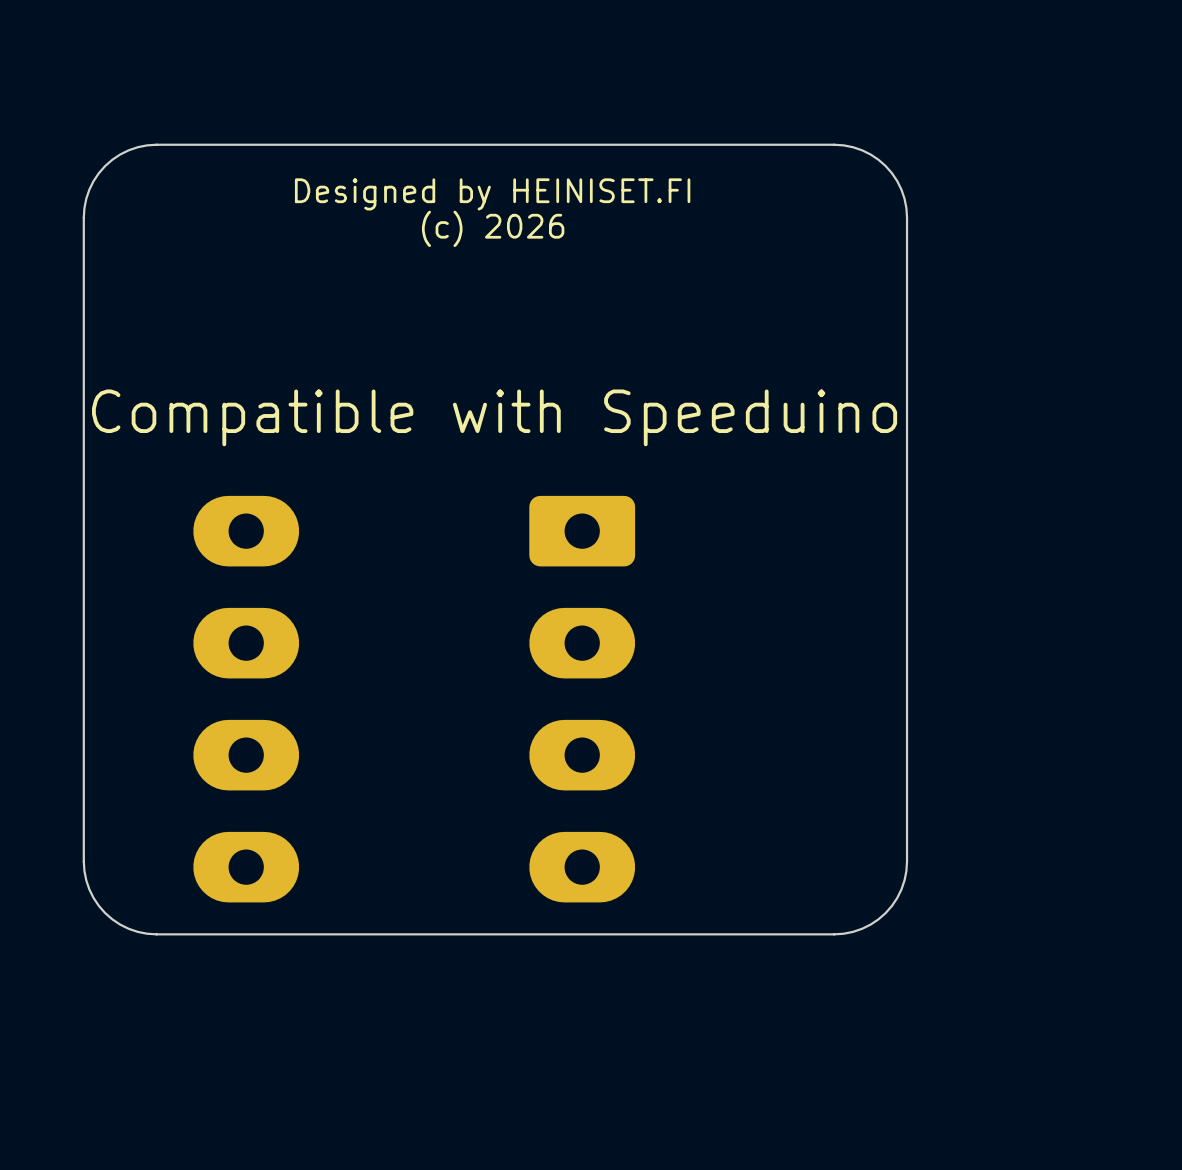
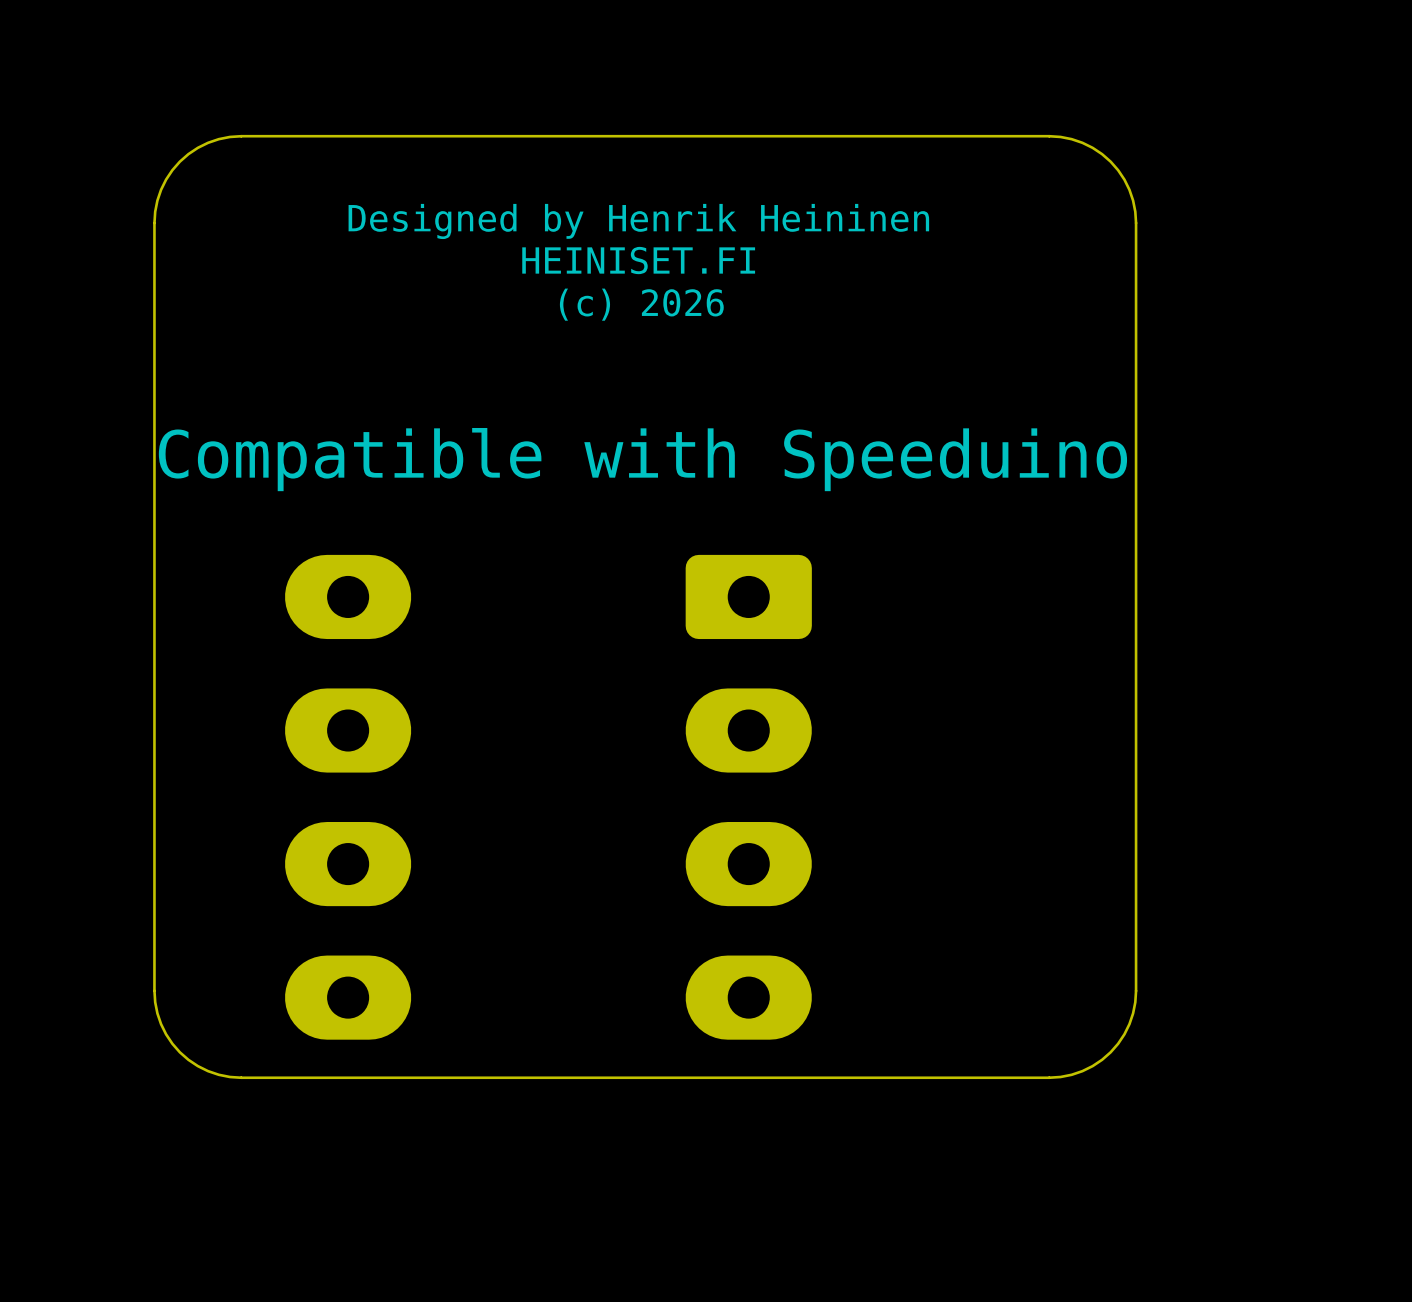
text: Designed by HEINISET.FI (492, 194) -> Designed by Henrik Heininen (638, 221)
text position: (c) 2026 (493, 228) -> (c) 2026 (641, 304)
text: none -> HEINISET.FI (638, 260)

